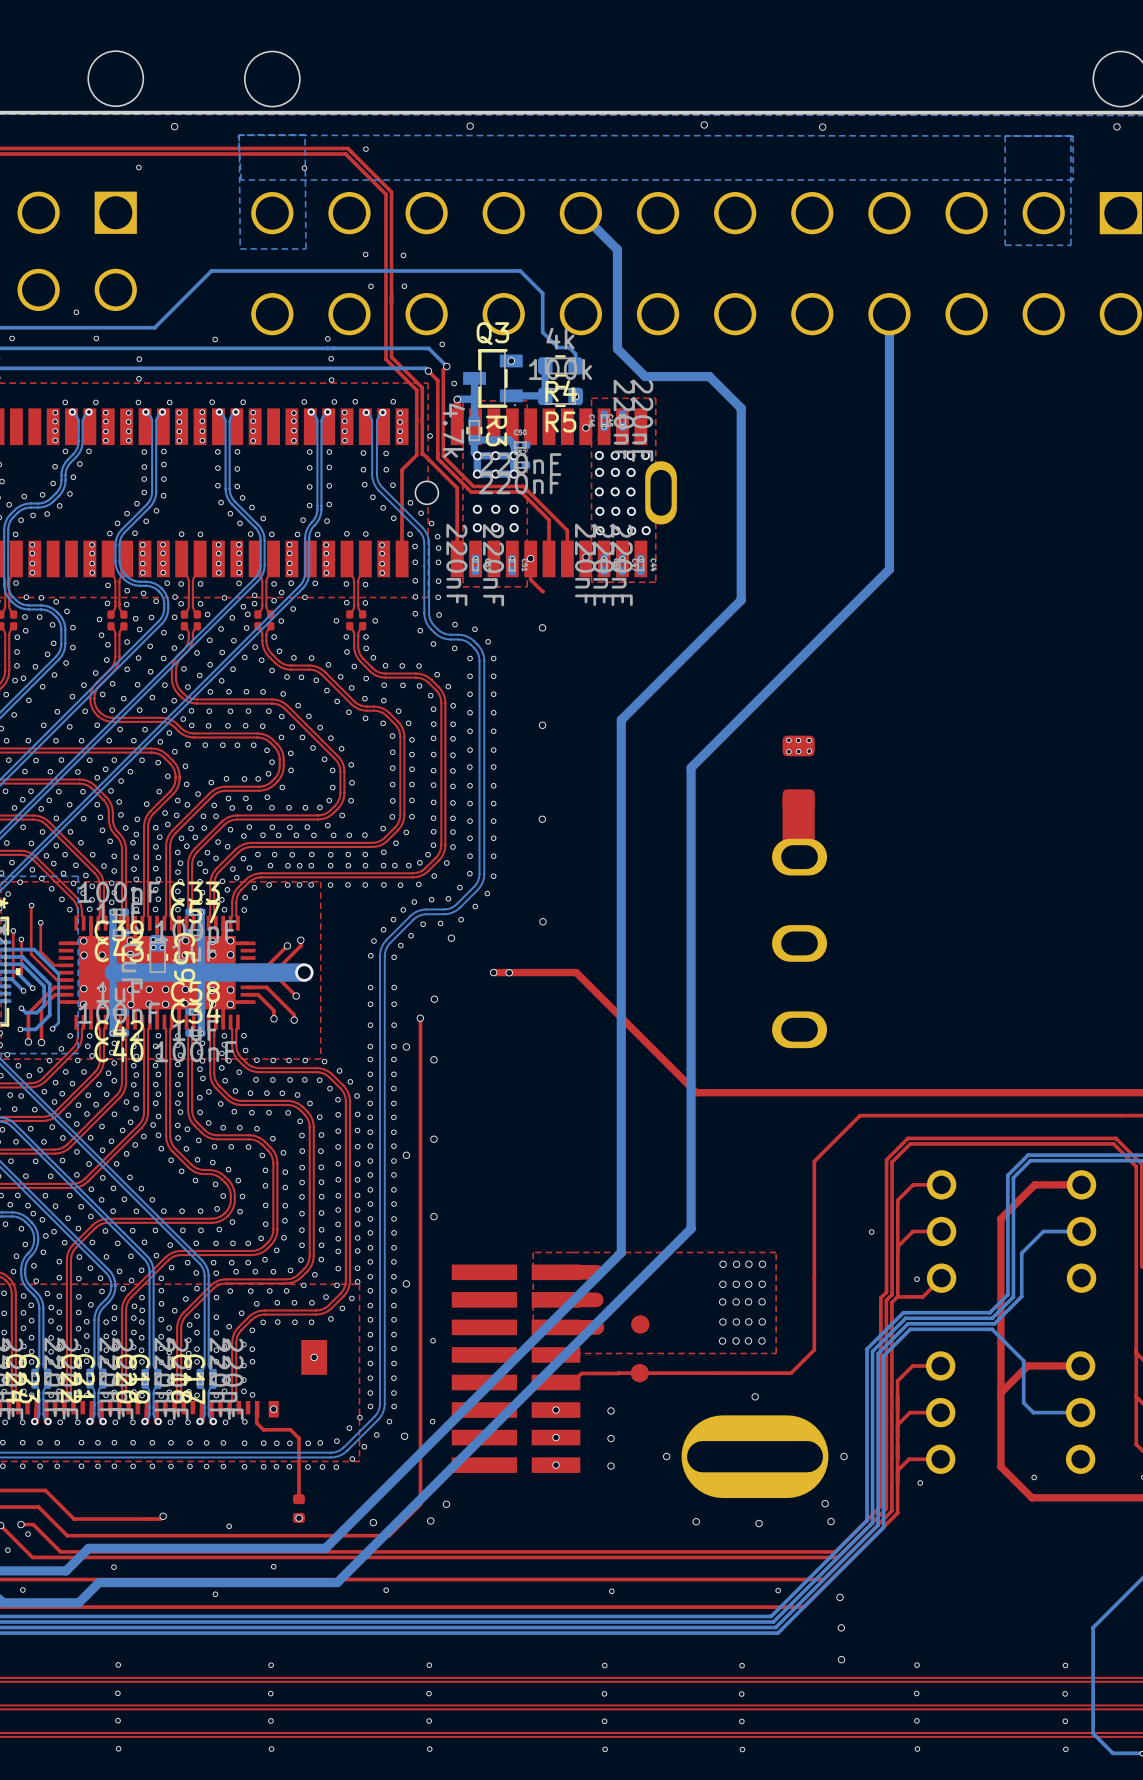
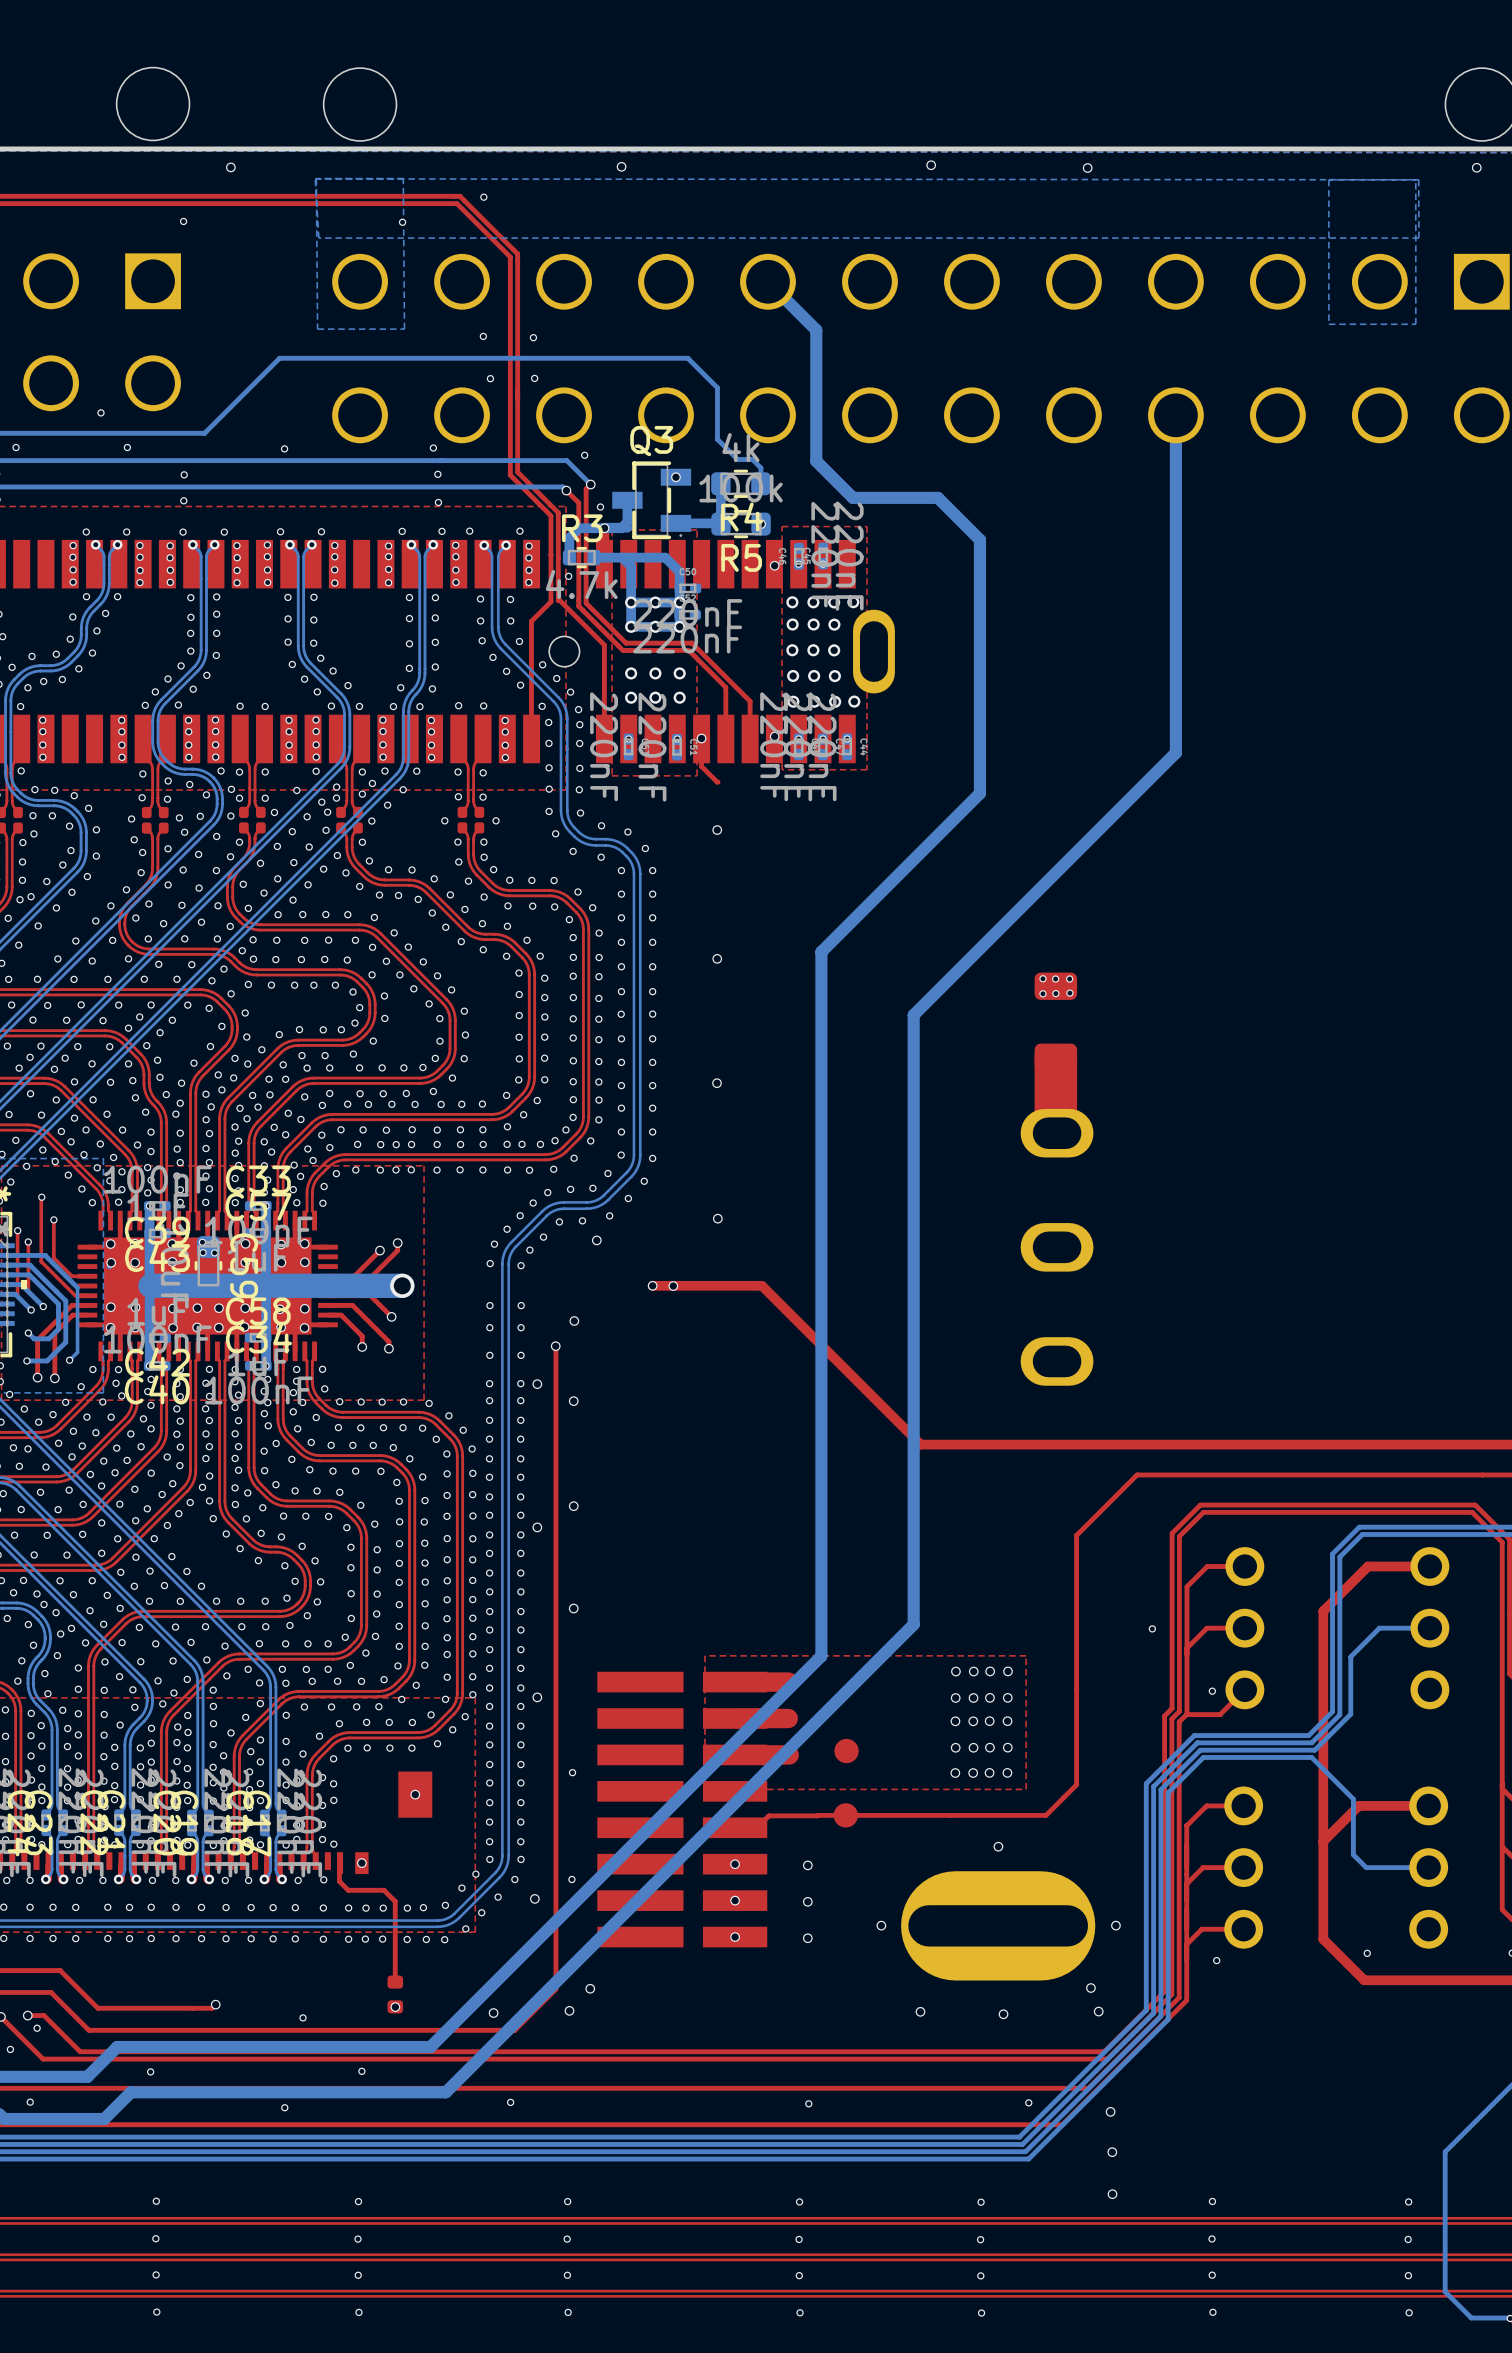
bottom track: (474, 394) (474, 421) -> (627, 522) (621, 528) (579, 528) (569, 537) (569, 557)
bottom track: none -> (622, 557) (631, 566) (631, 602)
R3 rotation: 0° (474, 430) -> 90° clockwise (581, 557)
R3 position: (474, 430) -> (581, 557)
bottom track: (514, 455) (514, 445) (509, 439) (474, 439) (474, 452) (477, 455) -> (679, 602) (679, 572) (665, 557) (594, 557)

